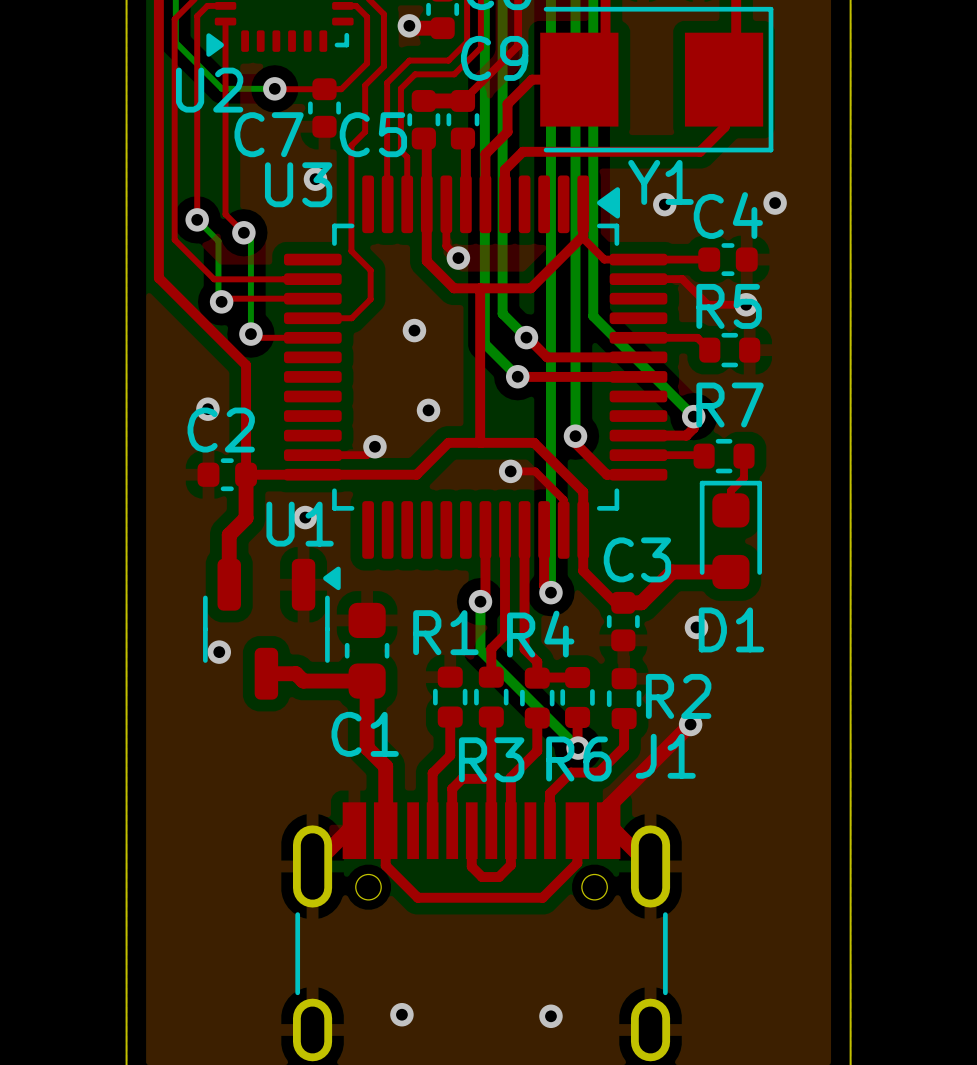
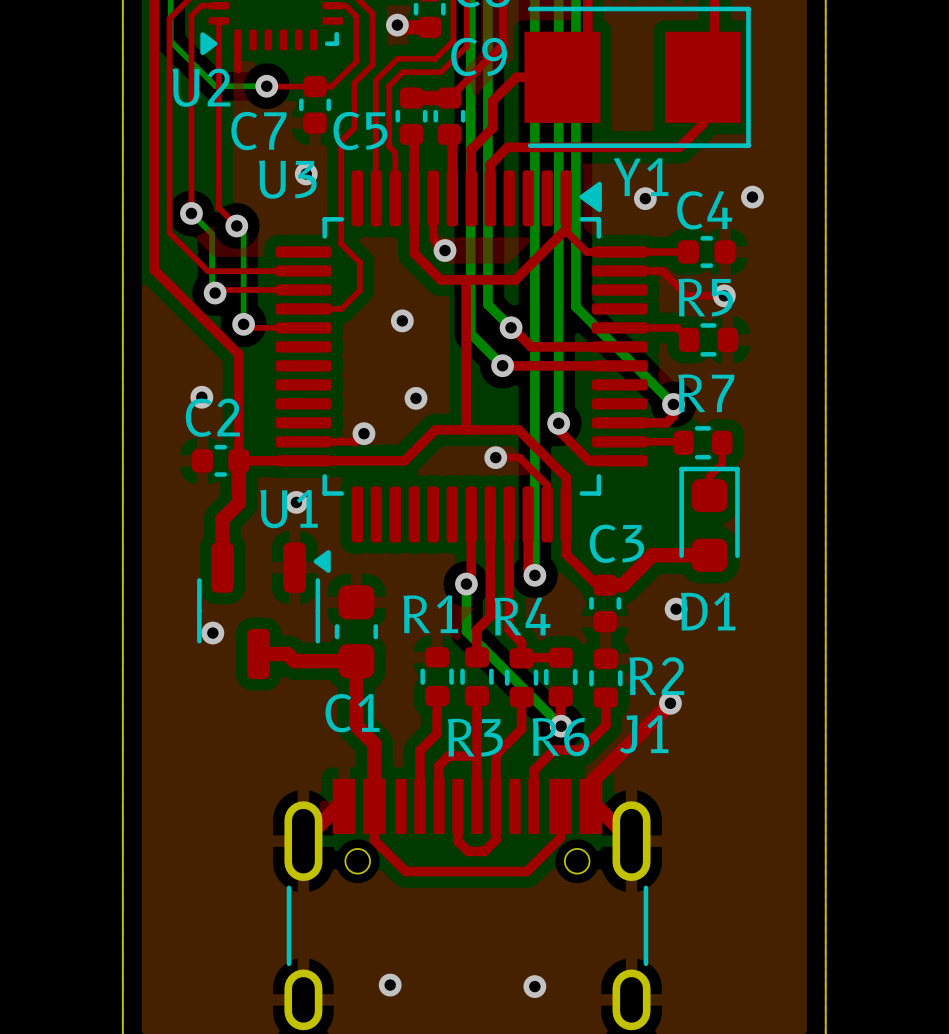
top track: none -> (237, 39) (237, 69)

